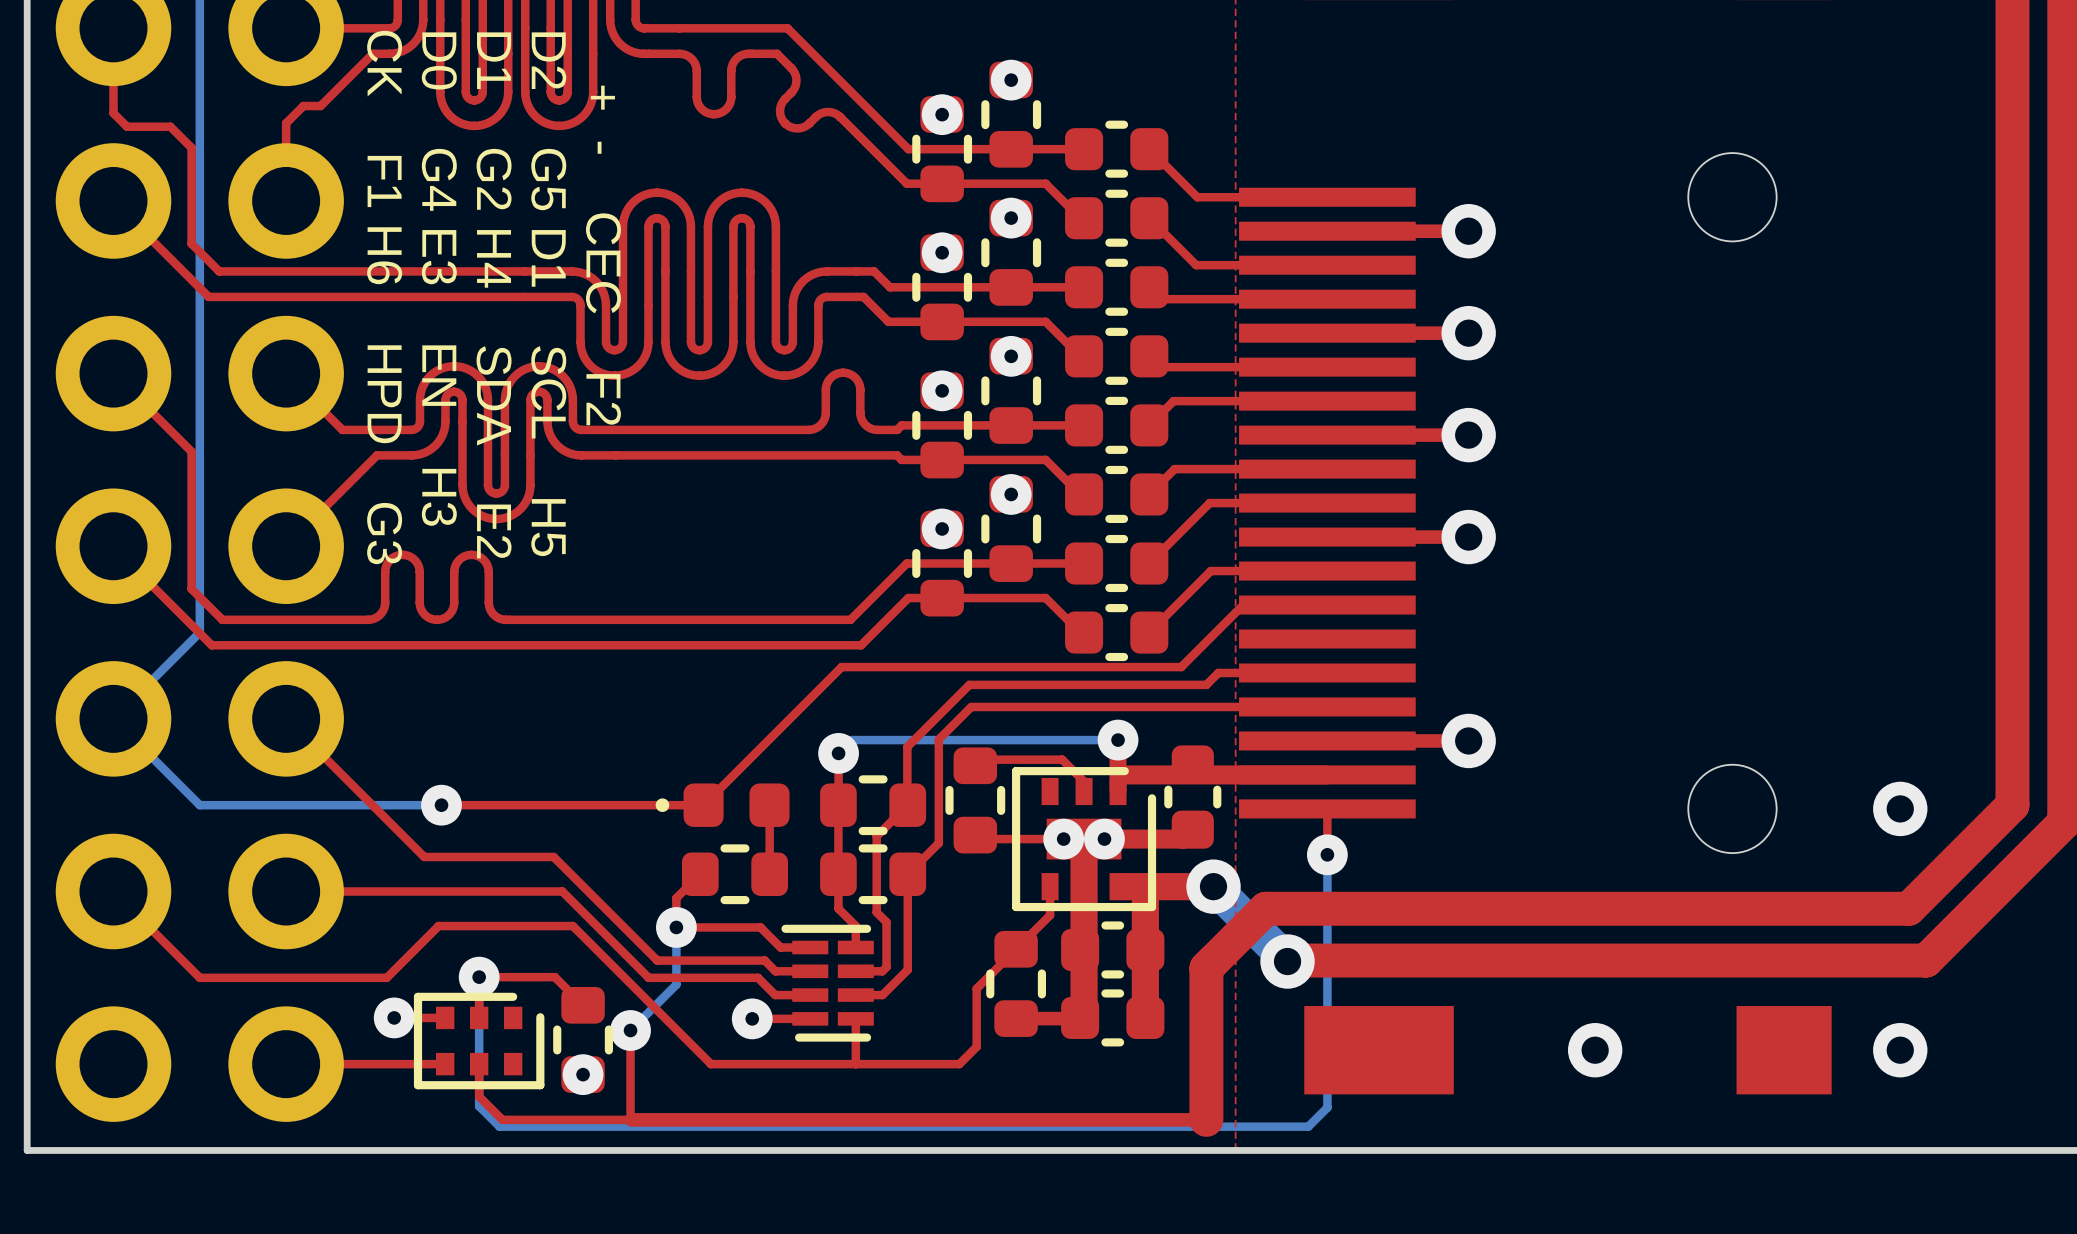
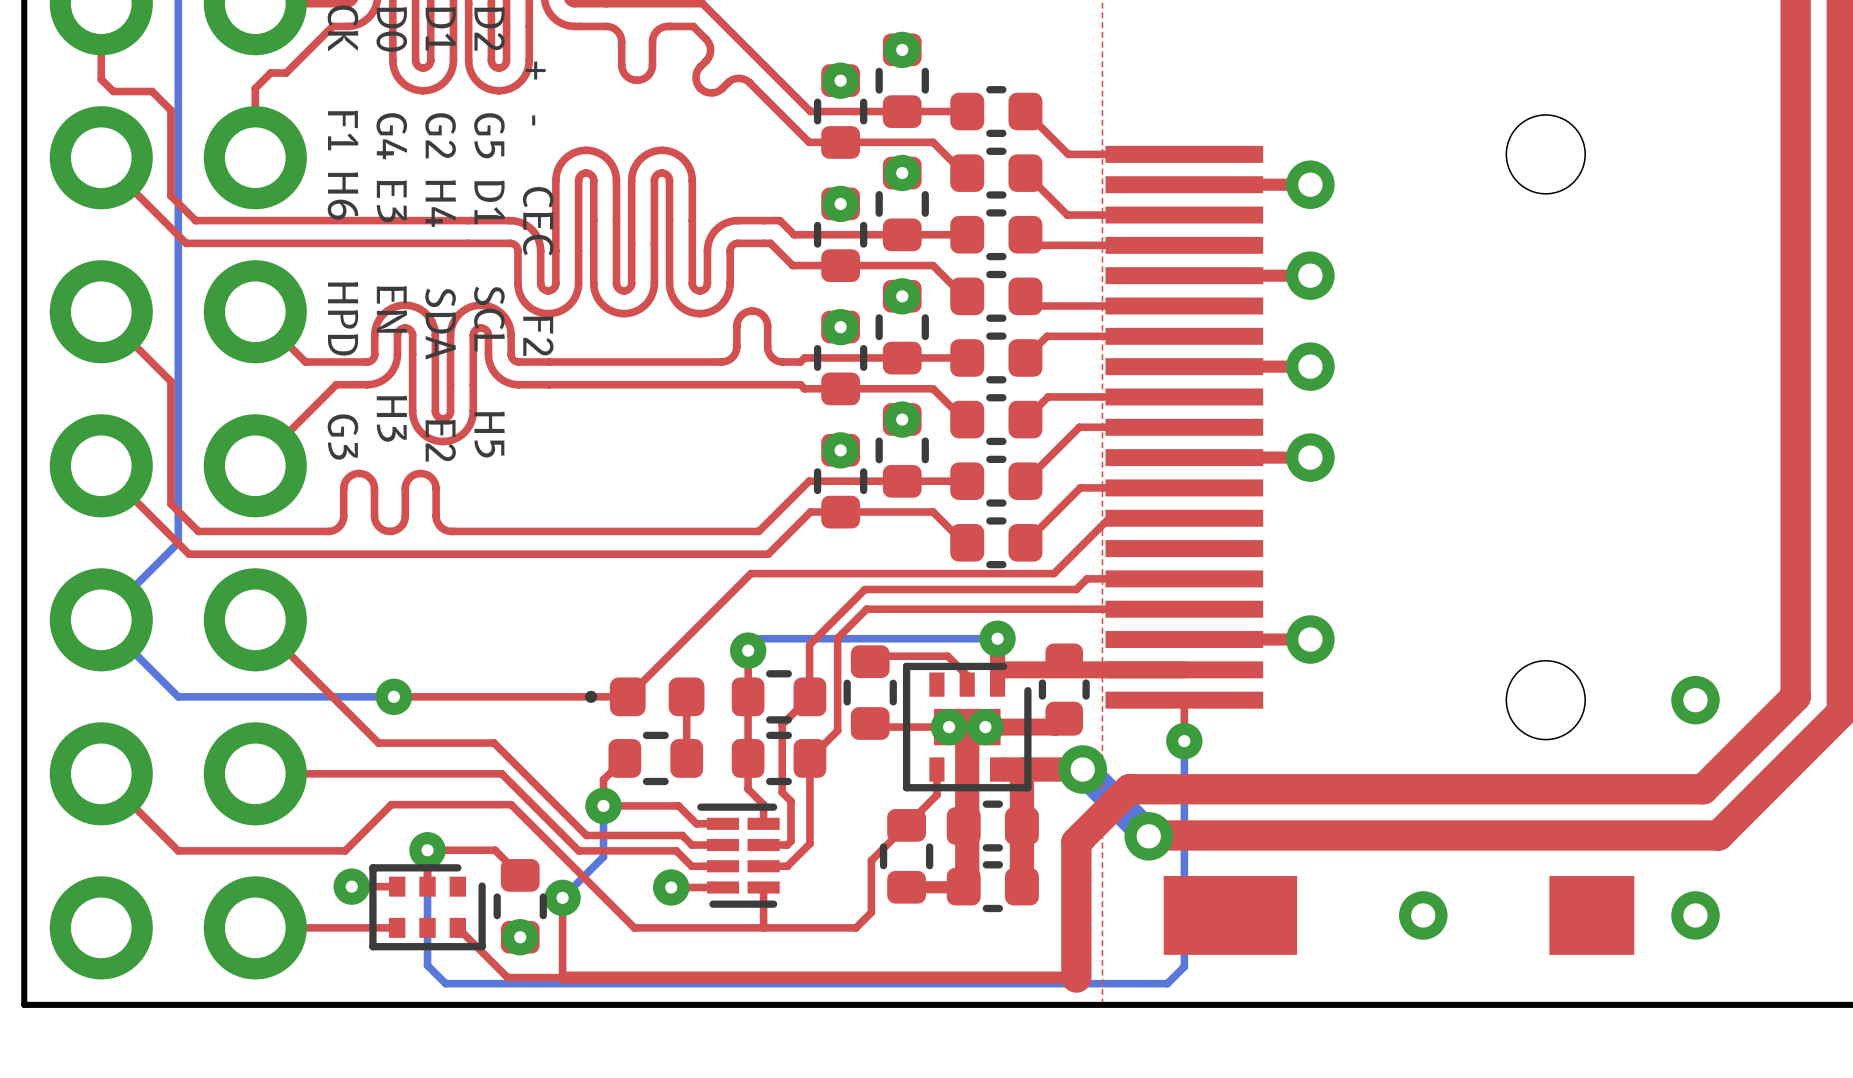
top track: (479, 1064) (479, 1096) (502, 1119) (568, 1119) -> (457, 927) (507, 977)

